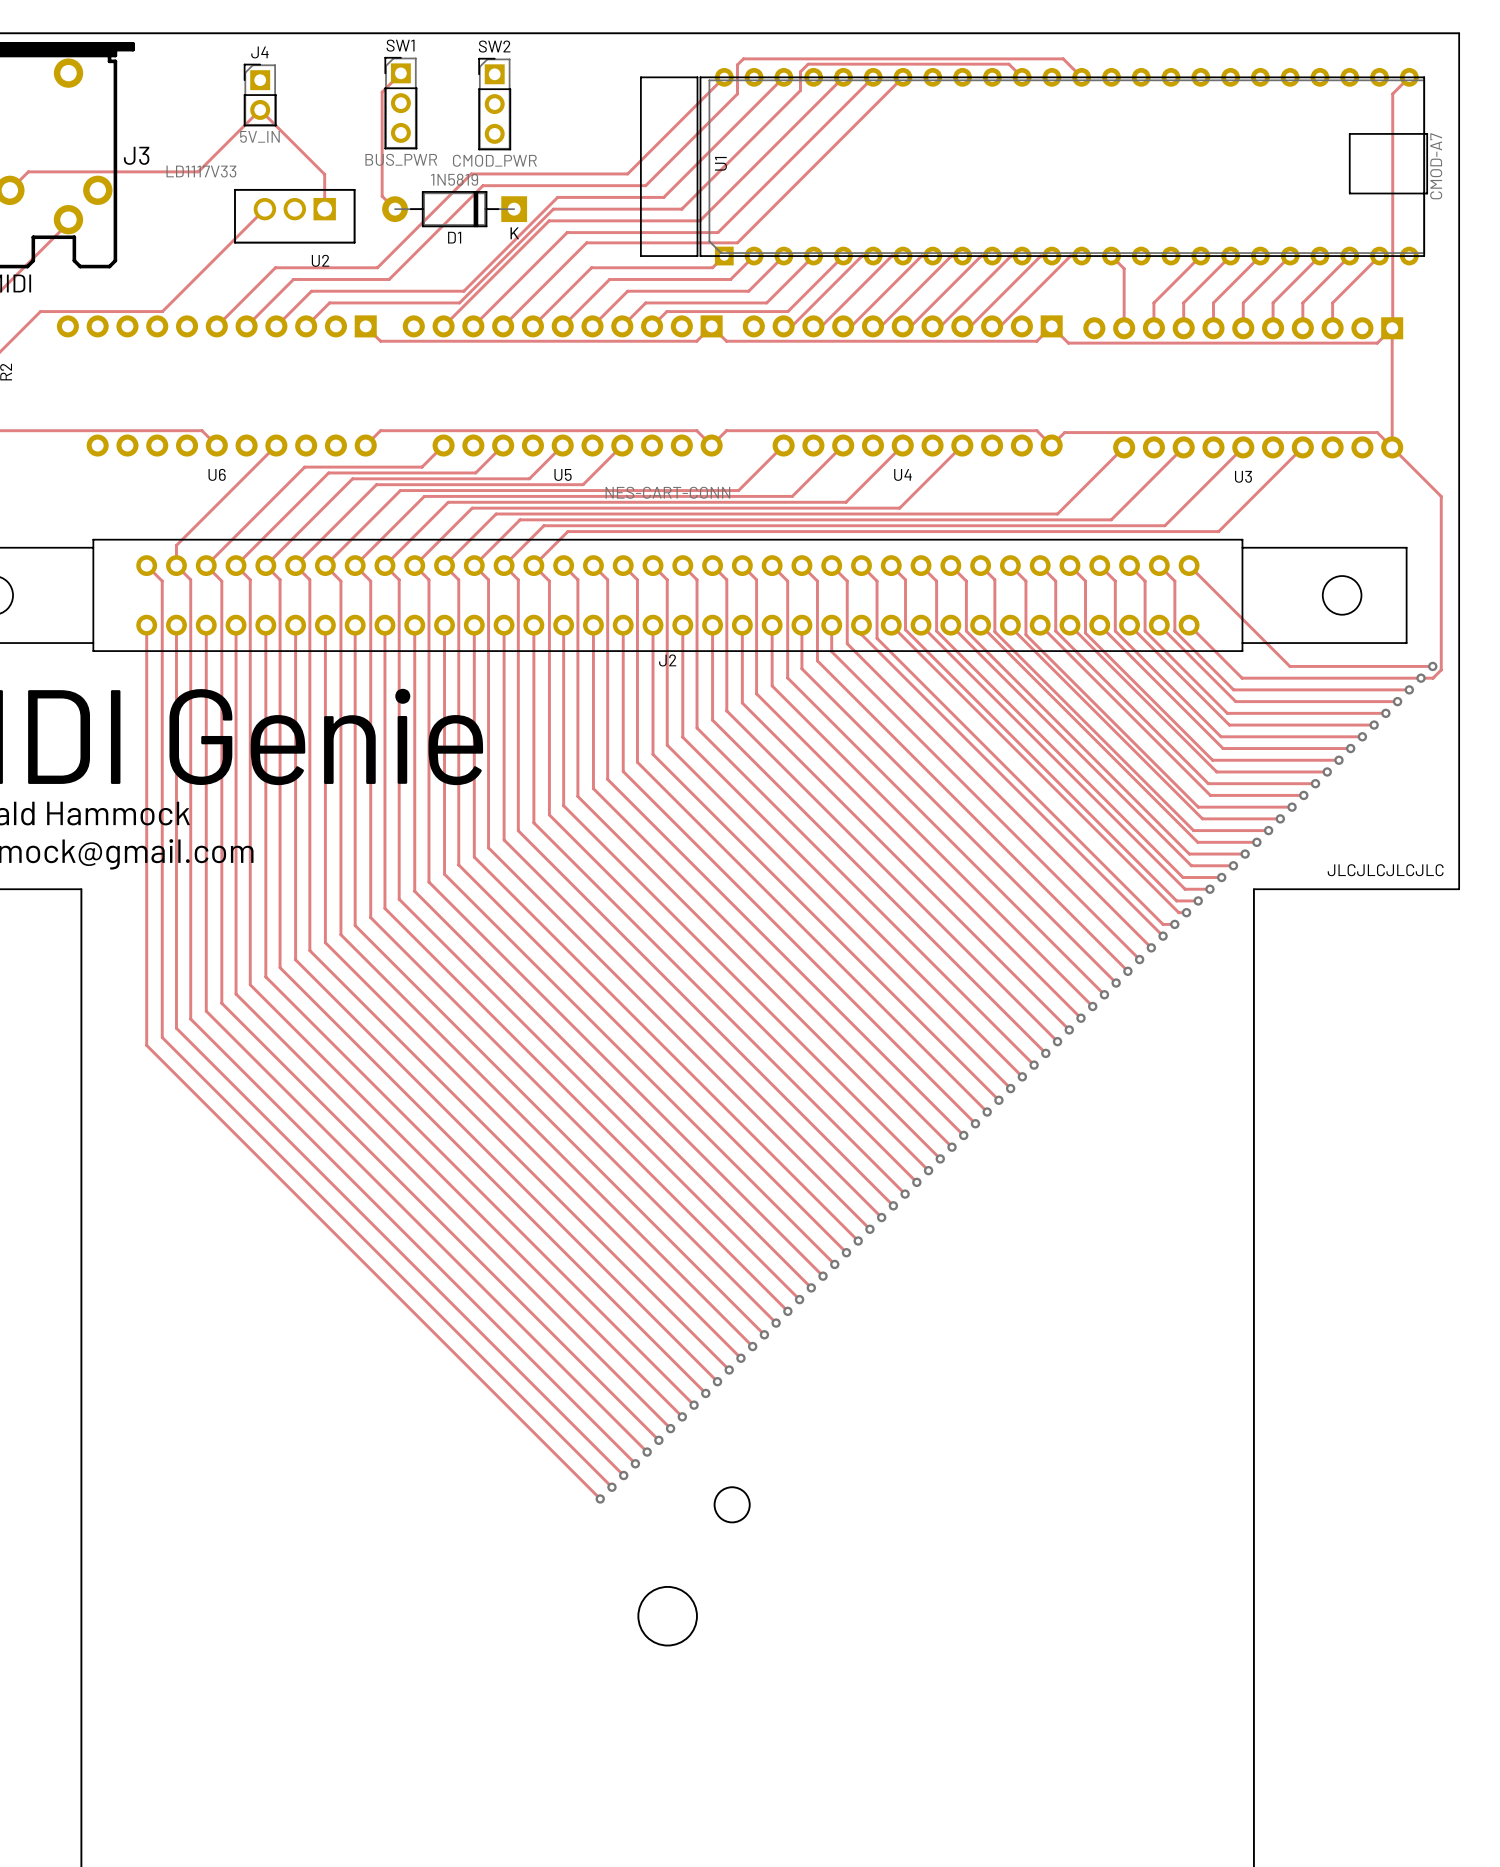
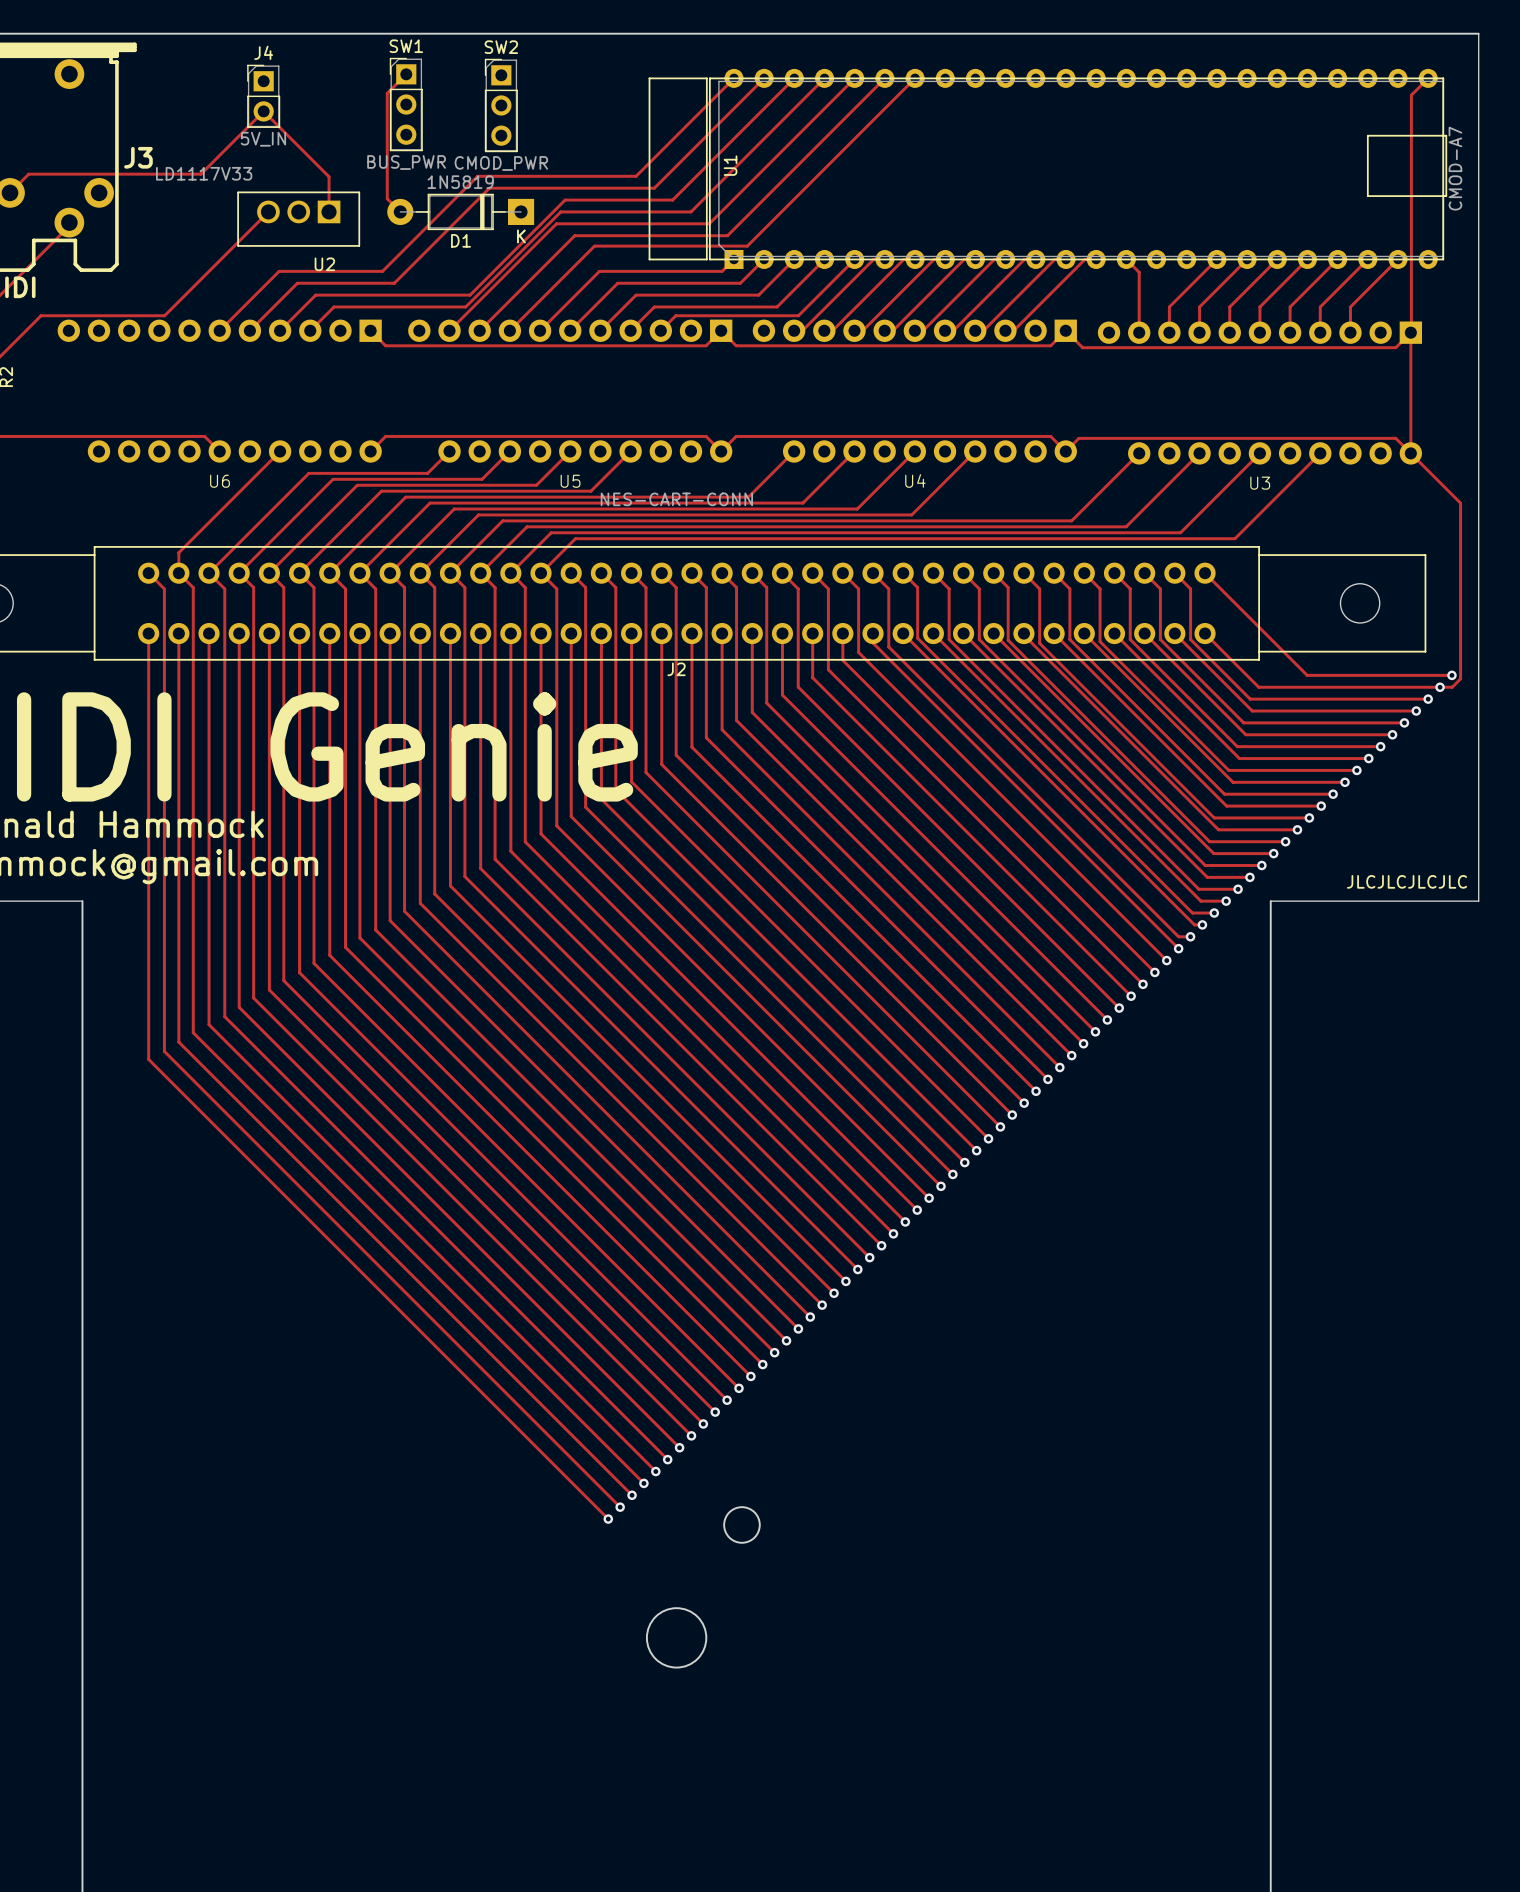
track: (1022, 77) (1008, 64) (808, 64) (800, 71) (800, 90) -> (824, 78) (811, 91)
track: (1081, 77) (1063, 58) (743, 58) (737, 64) (737, 93) -> (764, 78) (747, 95)

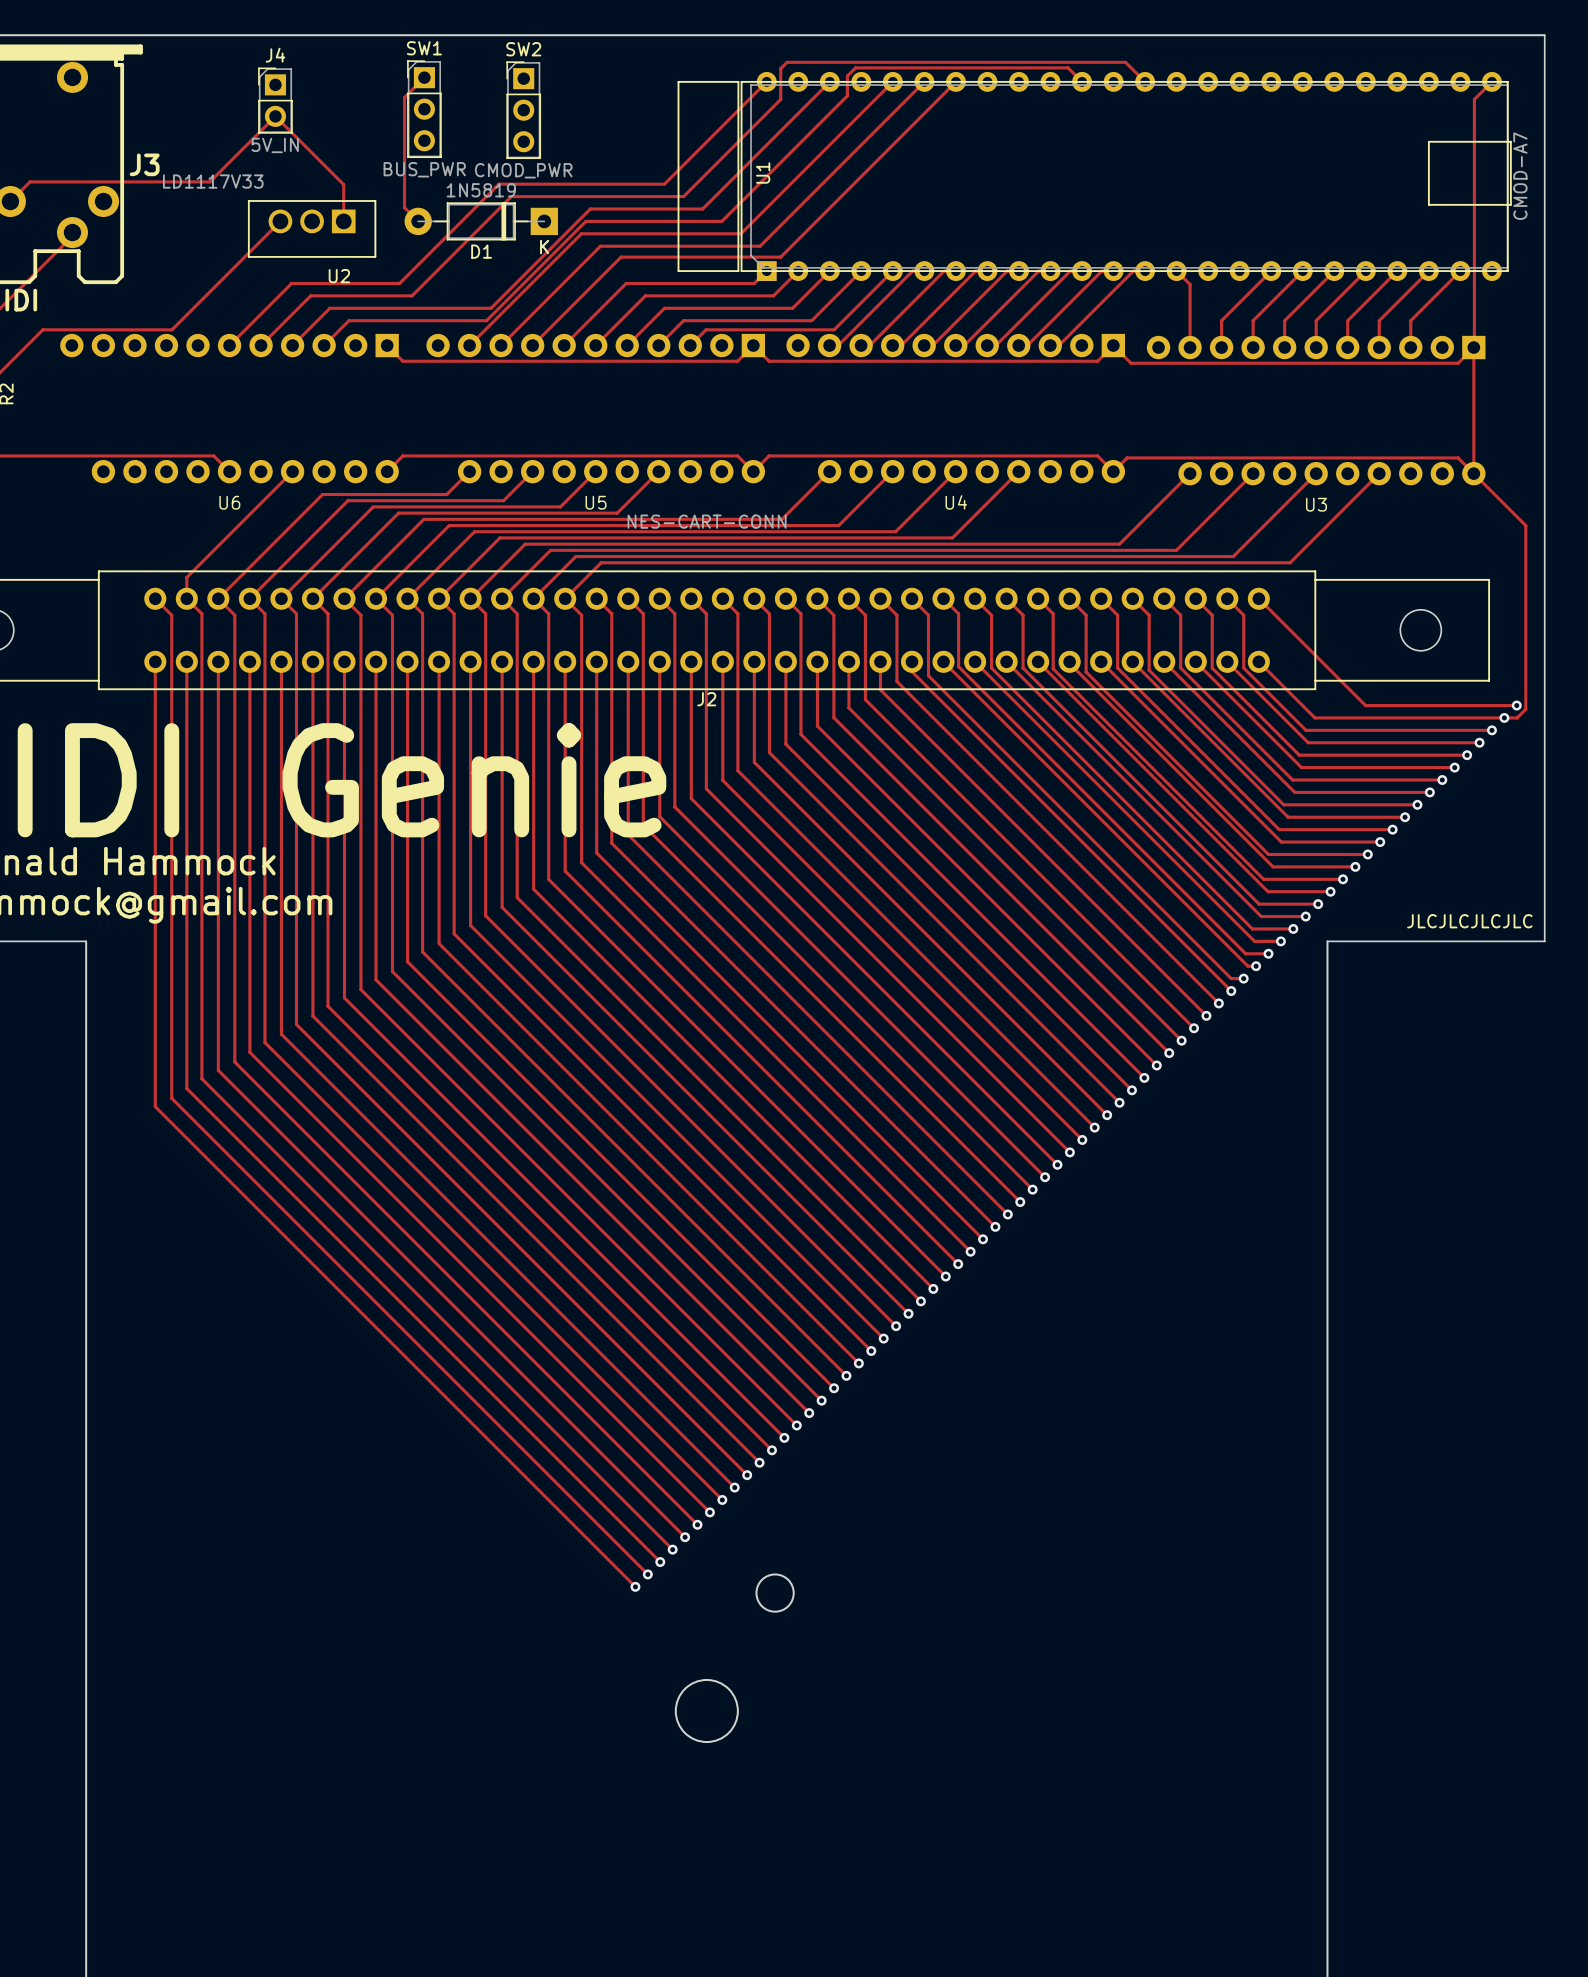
track: (764, 78) (747, 95) -> (1145, 81) (1125, 62) (787, 62) (780, 68) (780, 99)
track: (824, 78) (811, 91) -> (1082, 81) (1068, 67) (855, 67) (847, 76) (847, 95)

